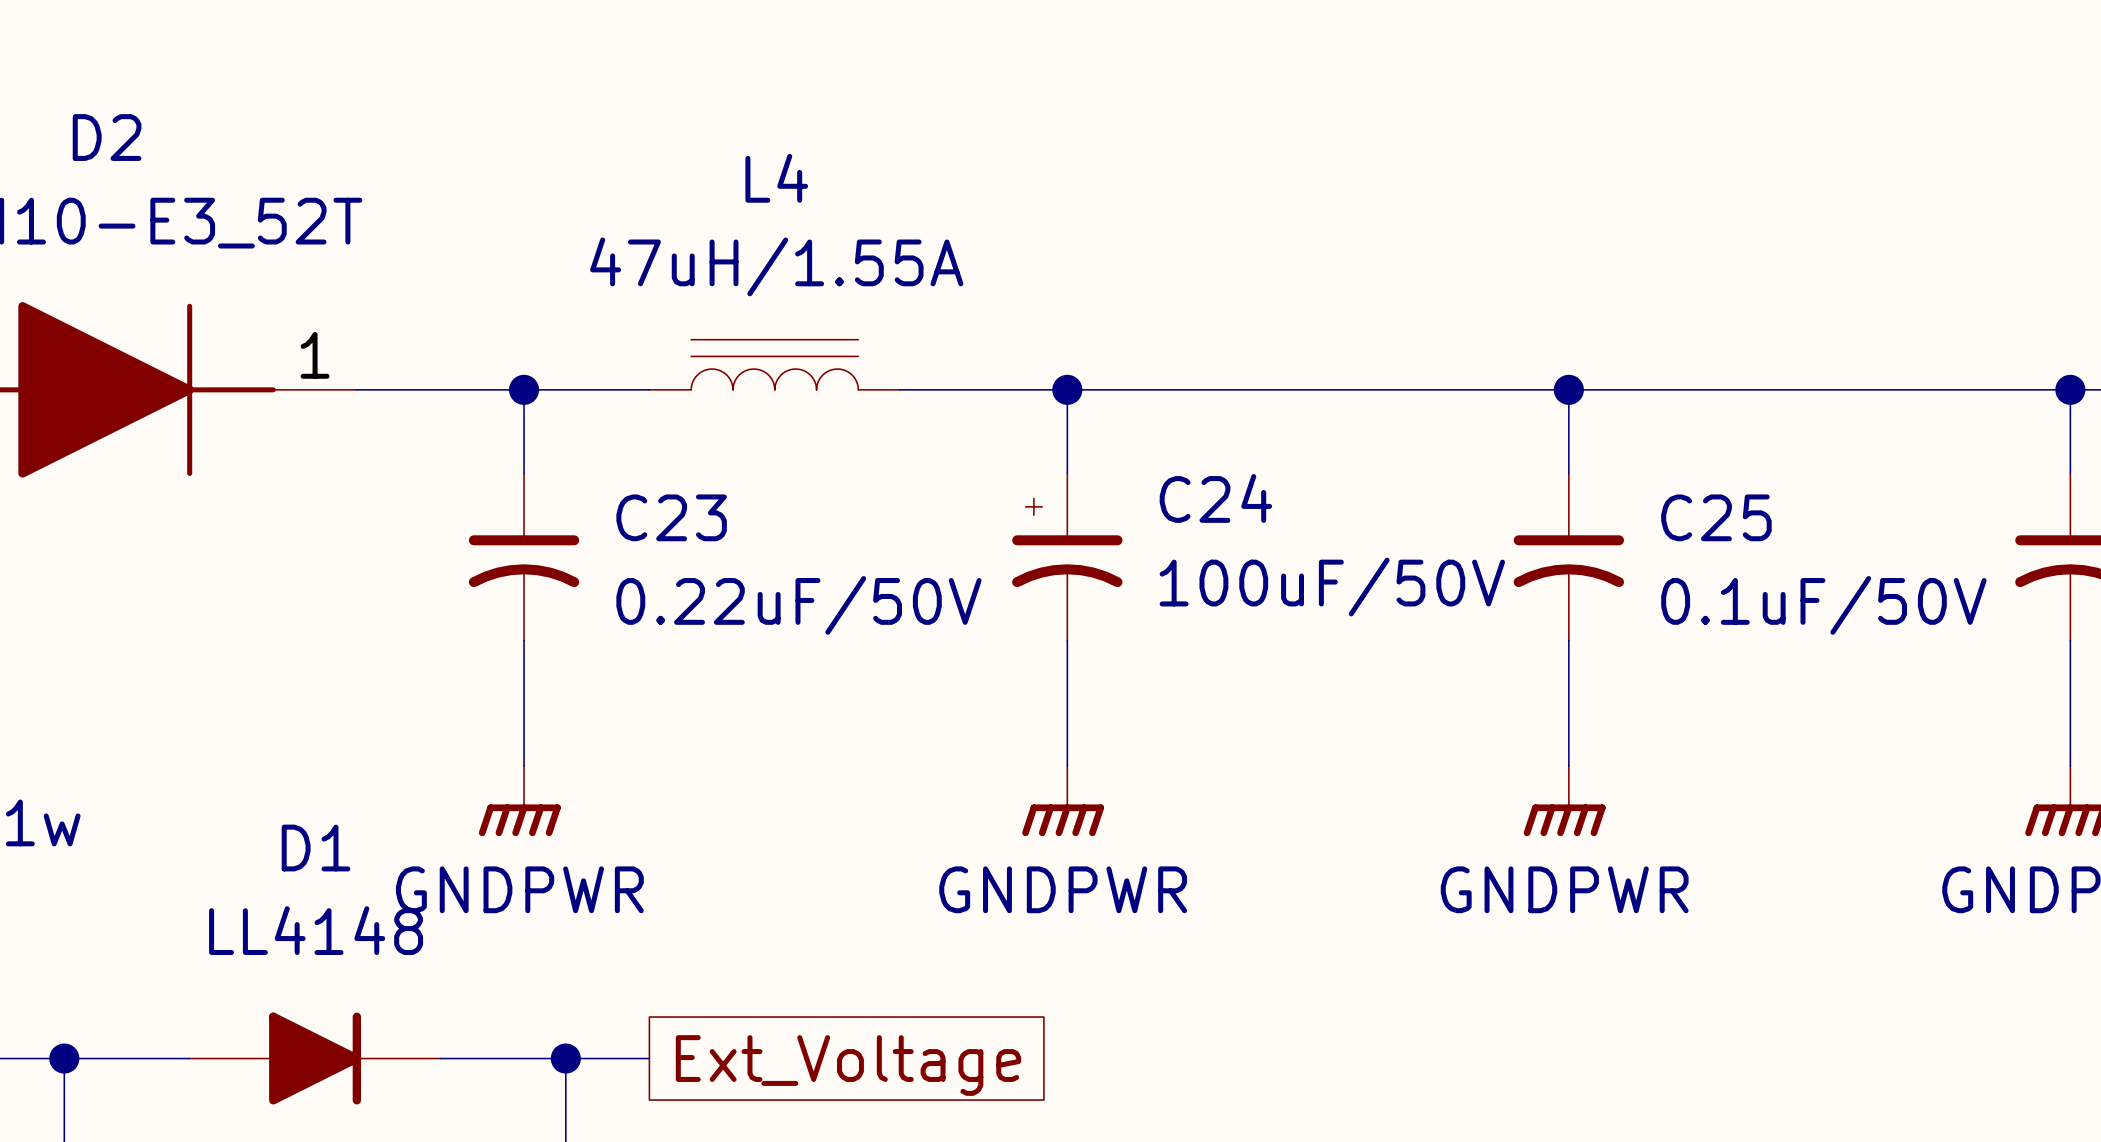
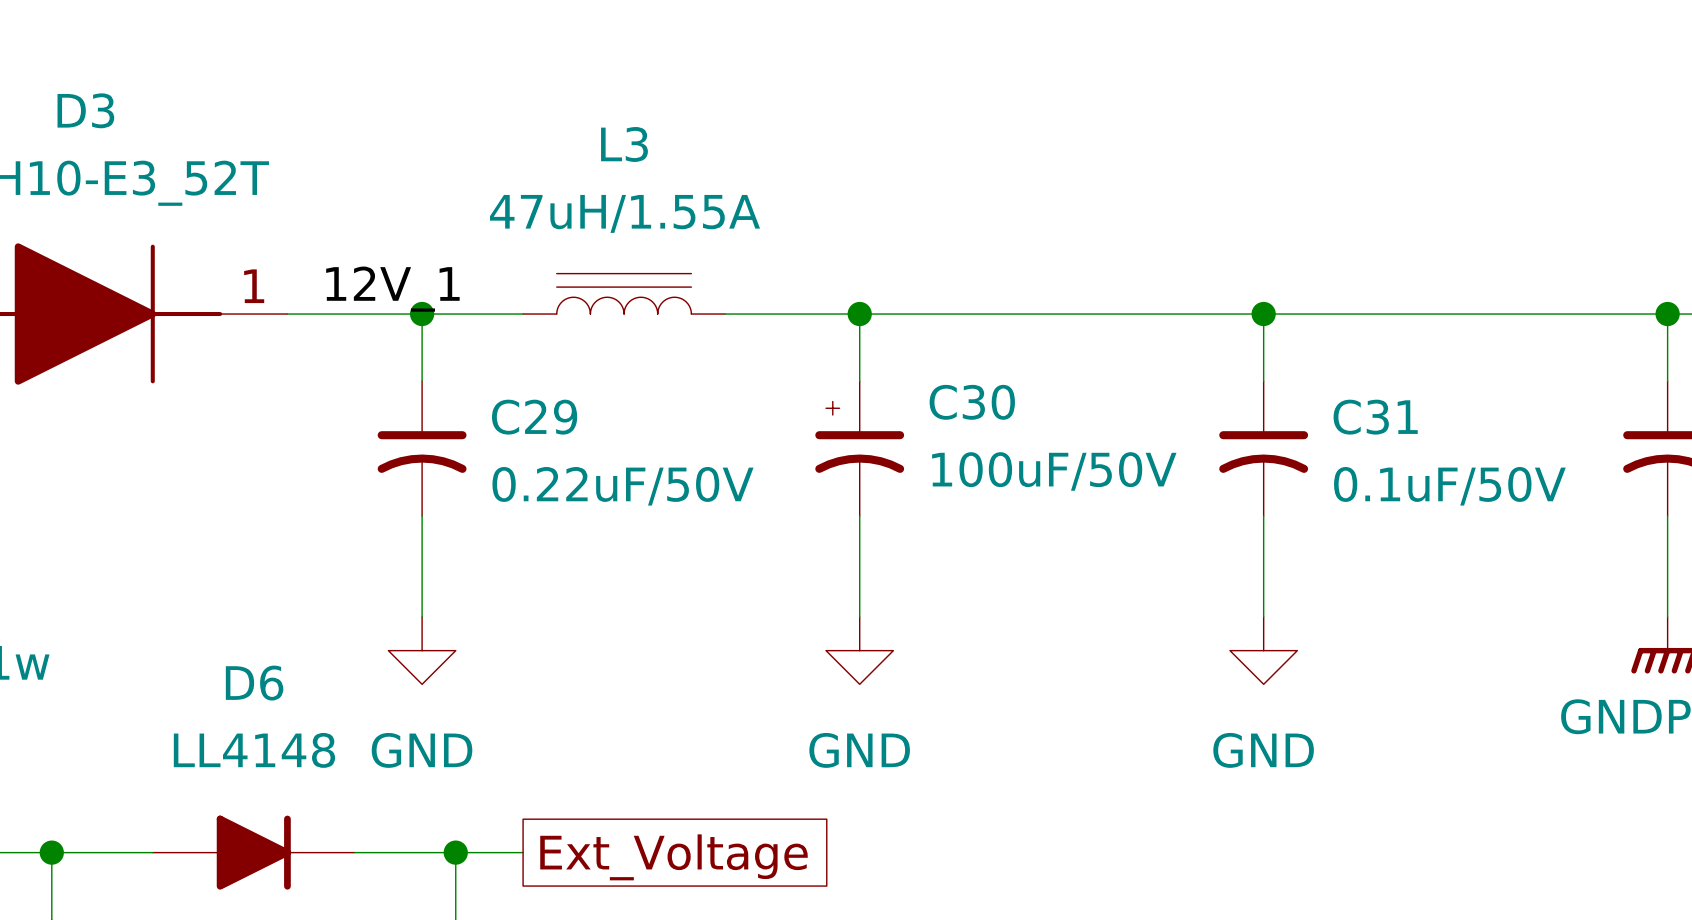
D2 name: D2 (107, 137) -> D3 (85, 110)
L4 name: L4 (776, 178) -> L3 (624, 144)
label: none -> 12V_1 (392, 289)
C24 name: C24 (1215, 498) -> C30 (972, 402)
C23 name: C23 (671, 517) -> C29 (534, 417)
C25 name: C25 (1716, 517) -> C31 (1375, 417)
power symbol: GNDPWR (519, 801) -> GND (422, 650)
power symbol: GNDPWR (1063, 801) -> GND (859, 650)
power symbol: GNDPWR (1564, 801) -> GND (1263, 650)
D1 name: D1 (316, 848) -> D6 (254, 683)

